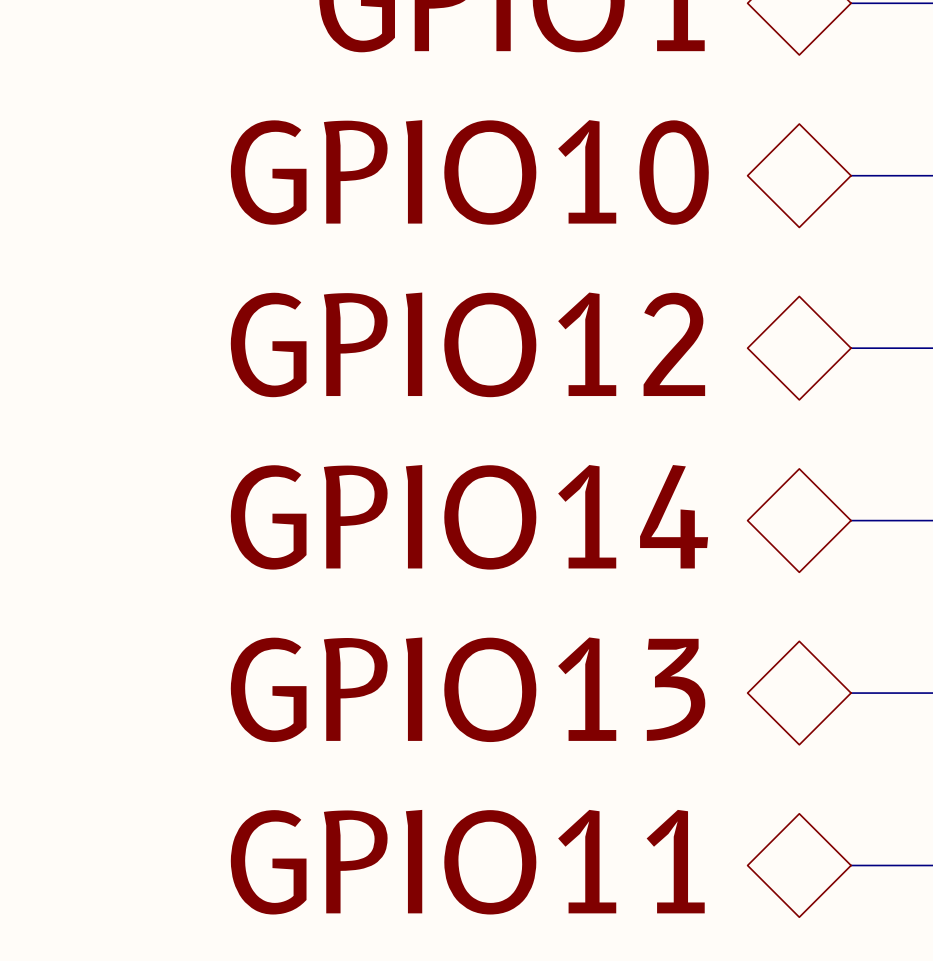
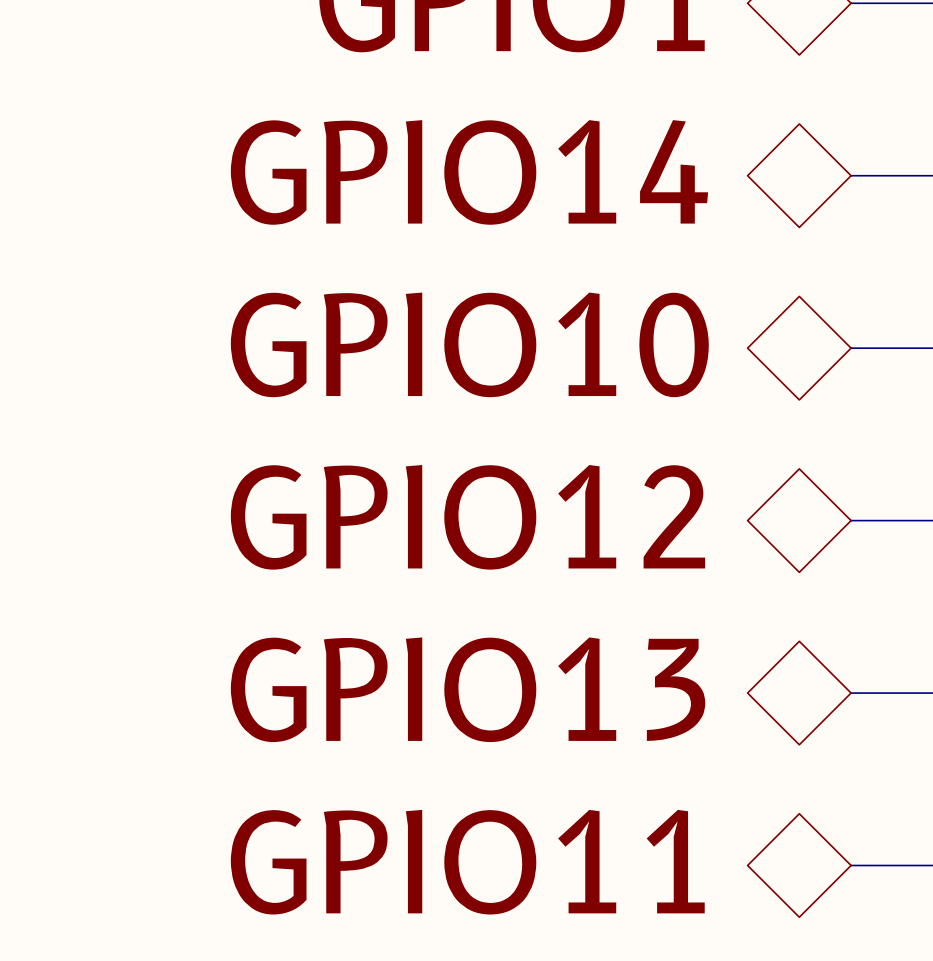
hierarchical label: GPIO10 (469, 172) -> GPIO14 (469, 172)
hierarchical label: GPIO12 (467, 344) -> GPIO10 (469, 344)
hierarchical label: GPIO14 (469, 517) -> GPIO12 (467, 517)

